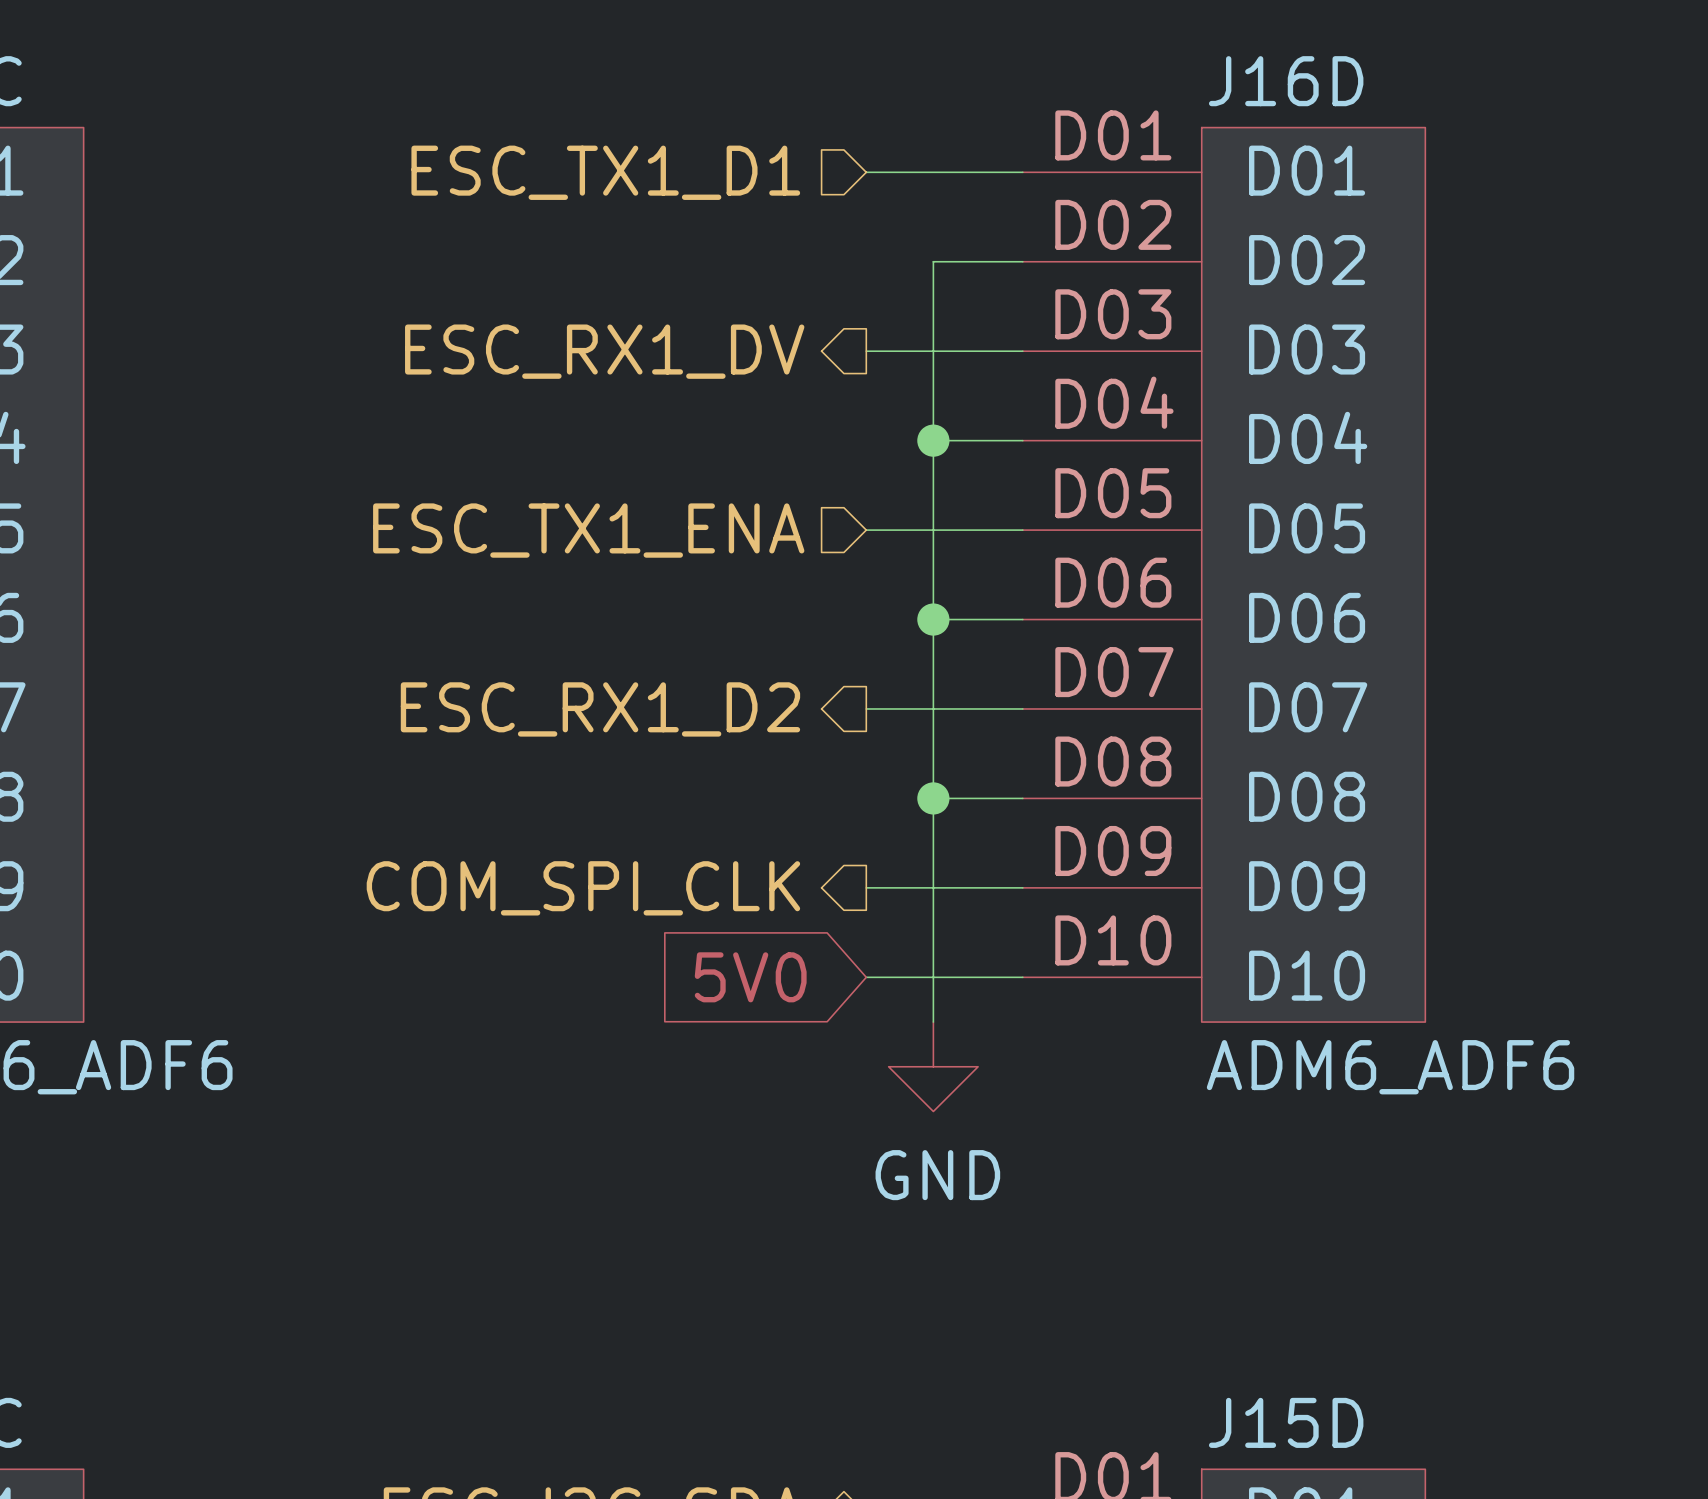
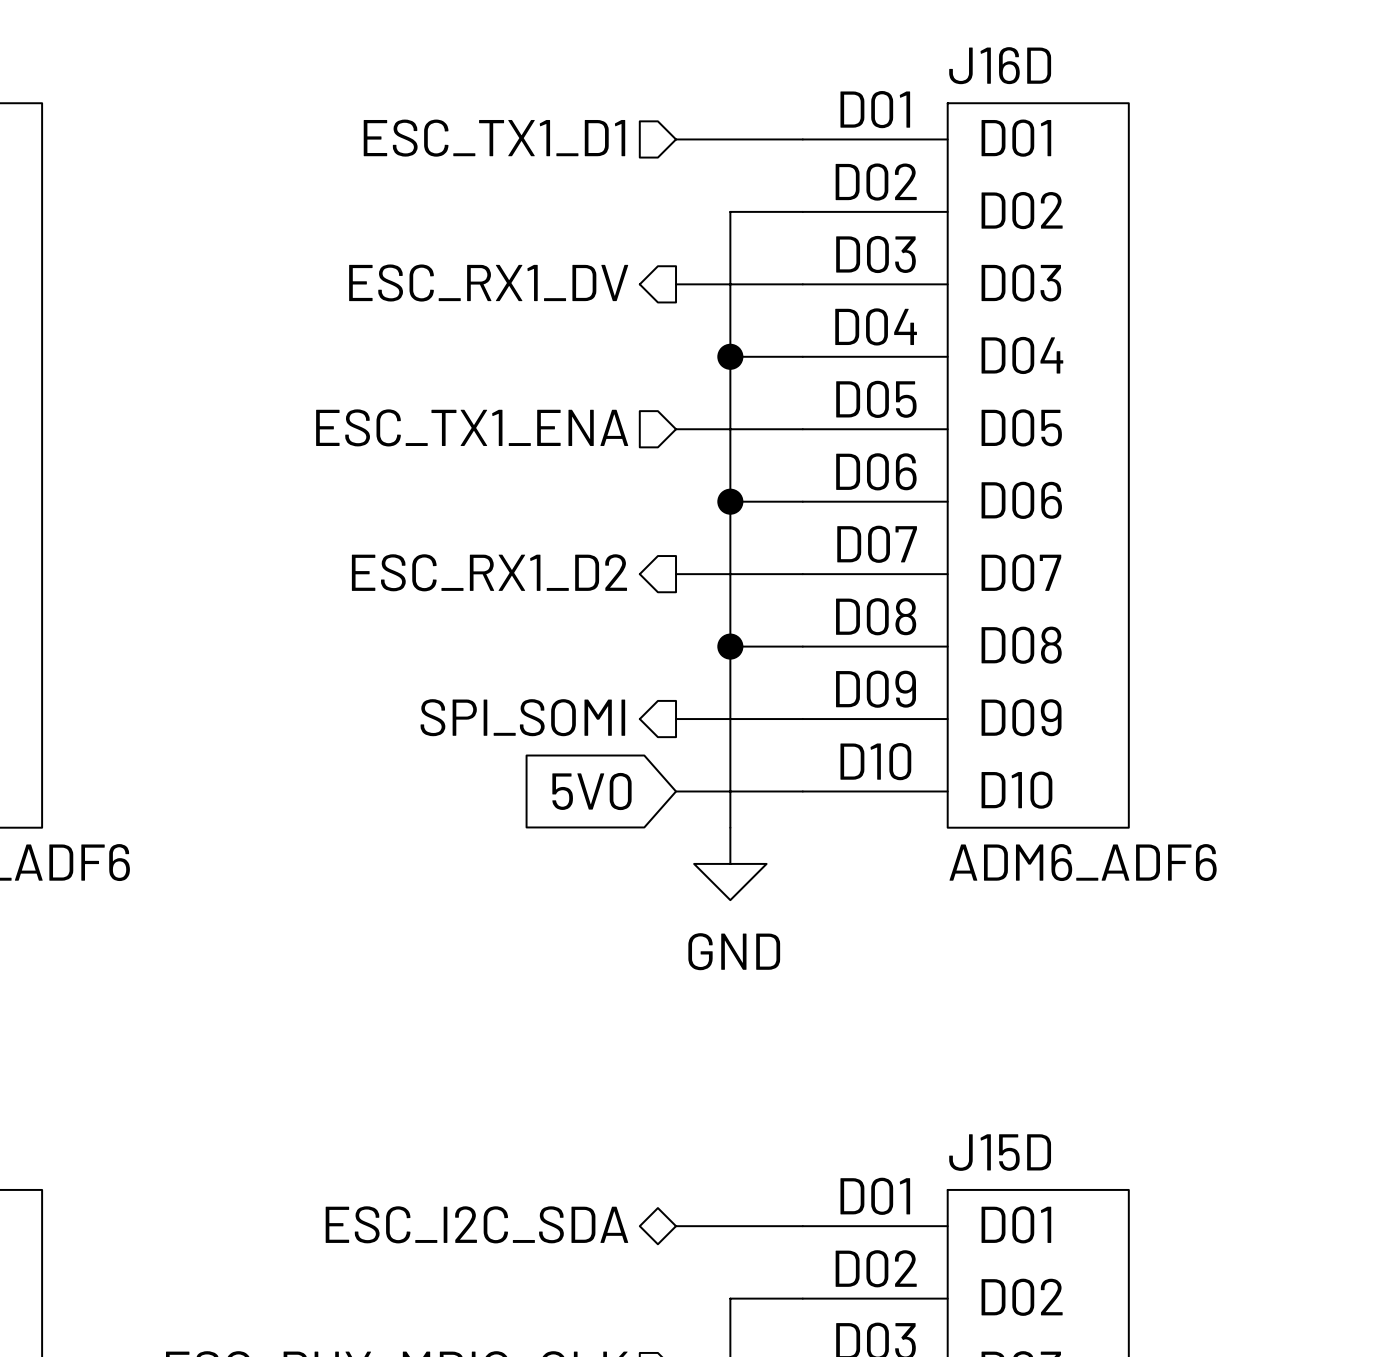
hierarchical label: COM_SPI_CLK (583, 888) -> SPI_SOMI (522, 717)

